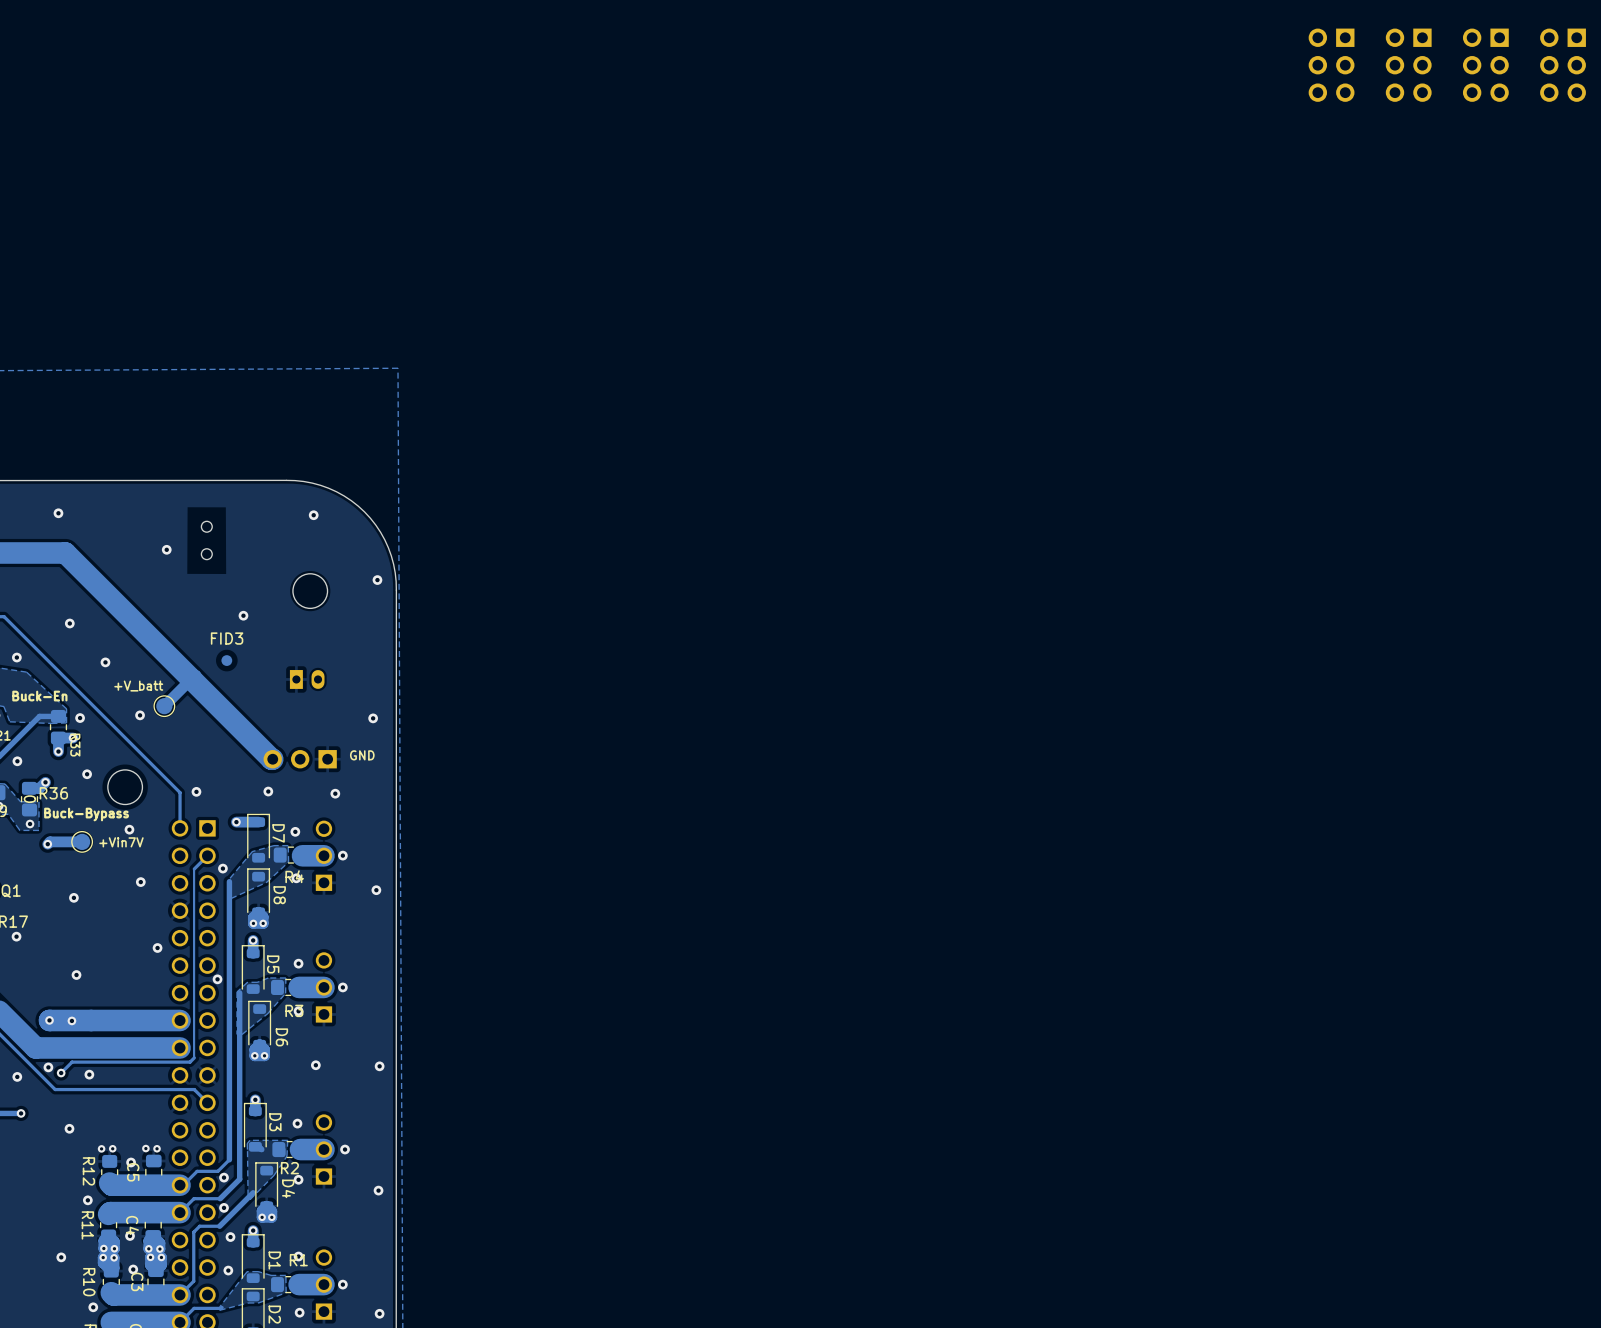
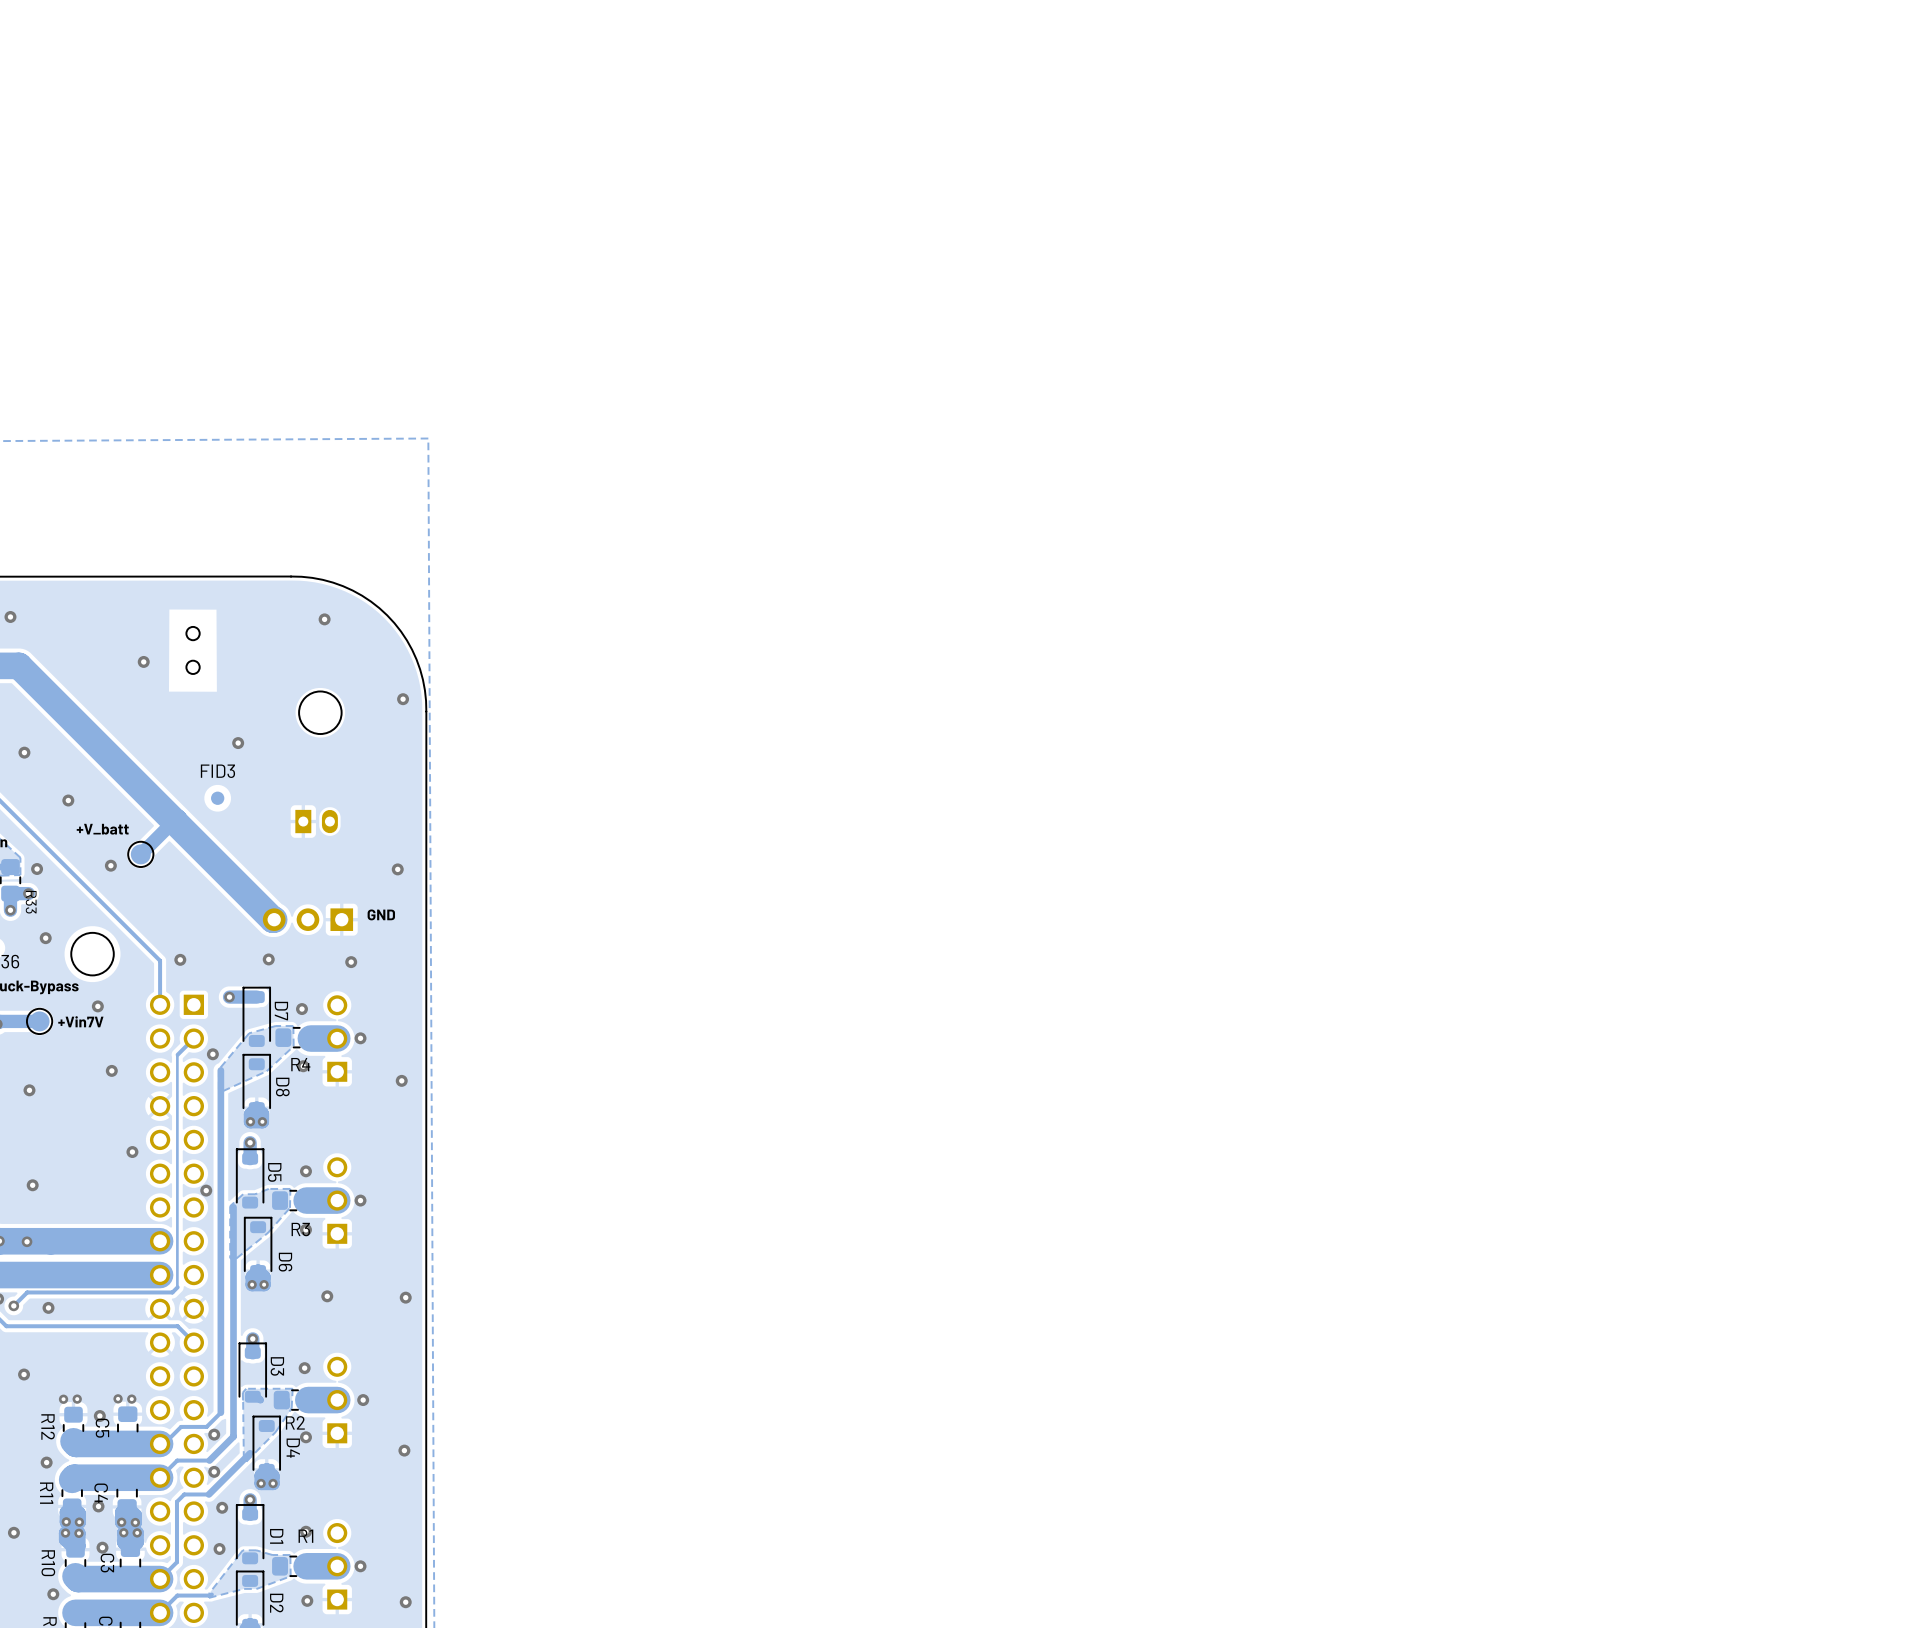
part: (1331, 65) -> none
part: (1408, 65) -> none
part: (1485, 65) -> none
part: (1563, 65) -> none

